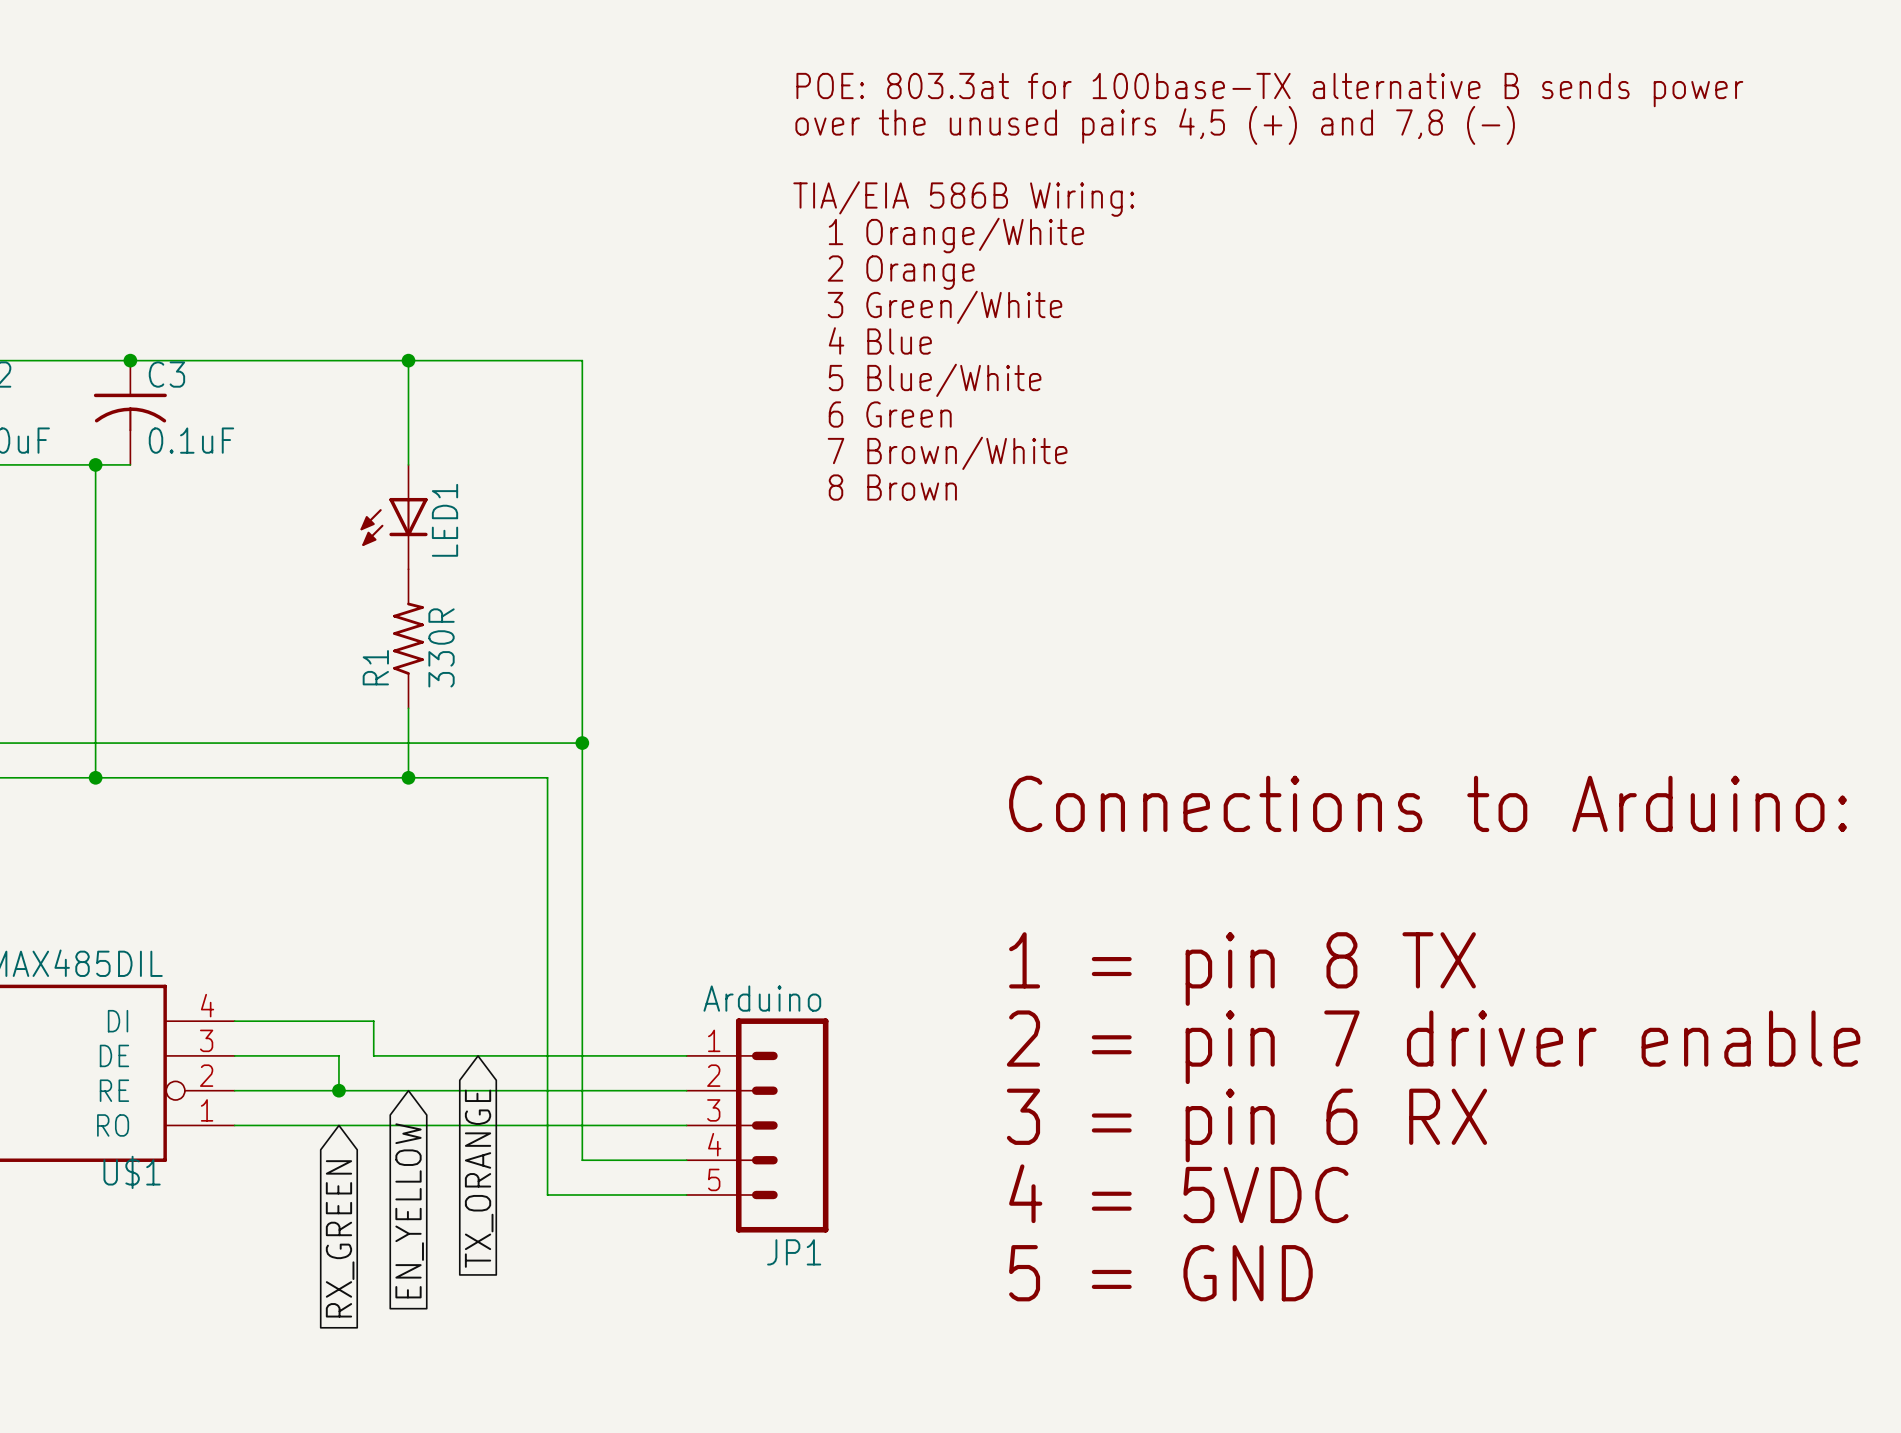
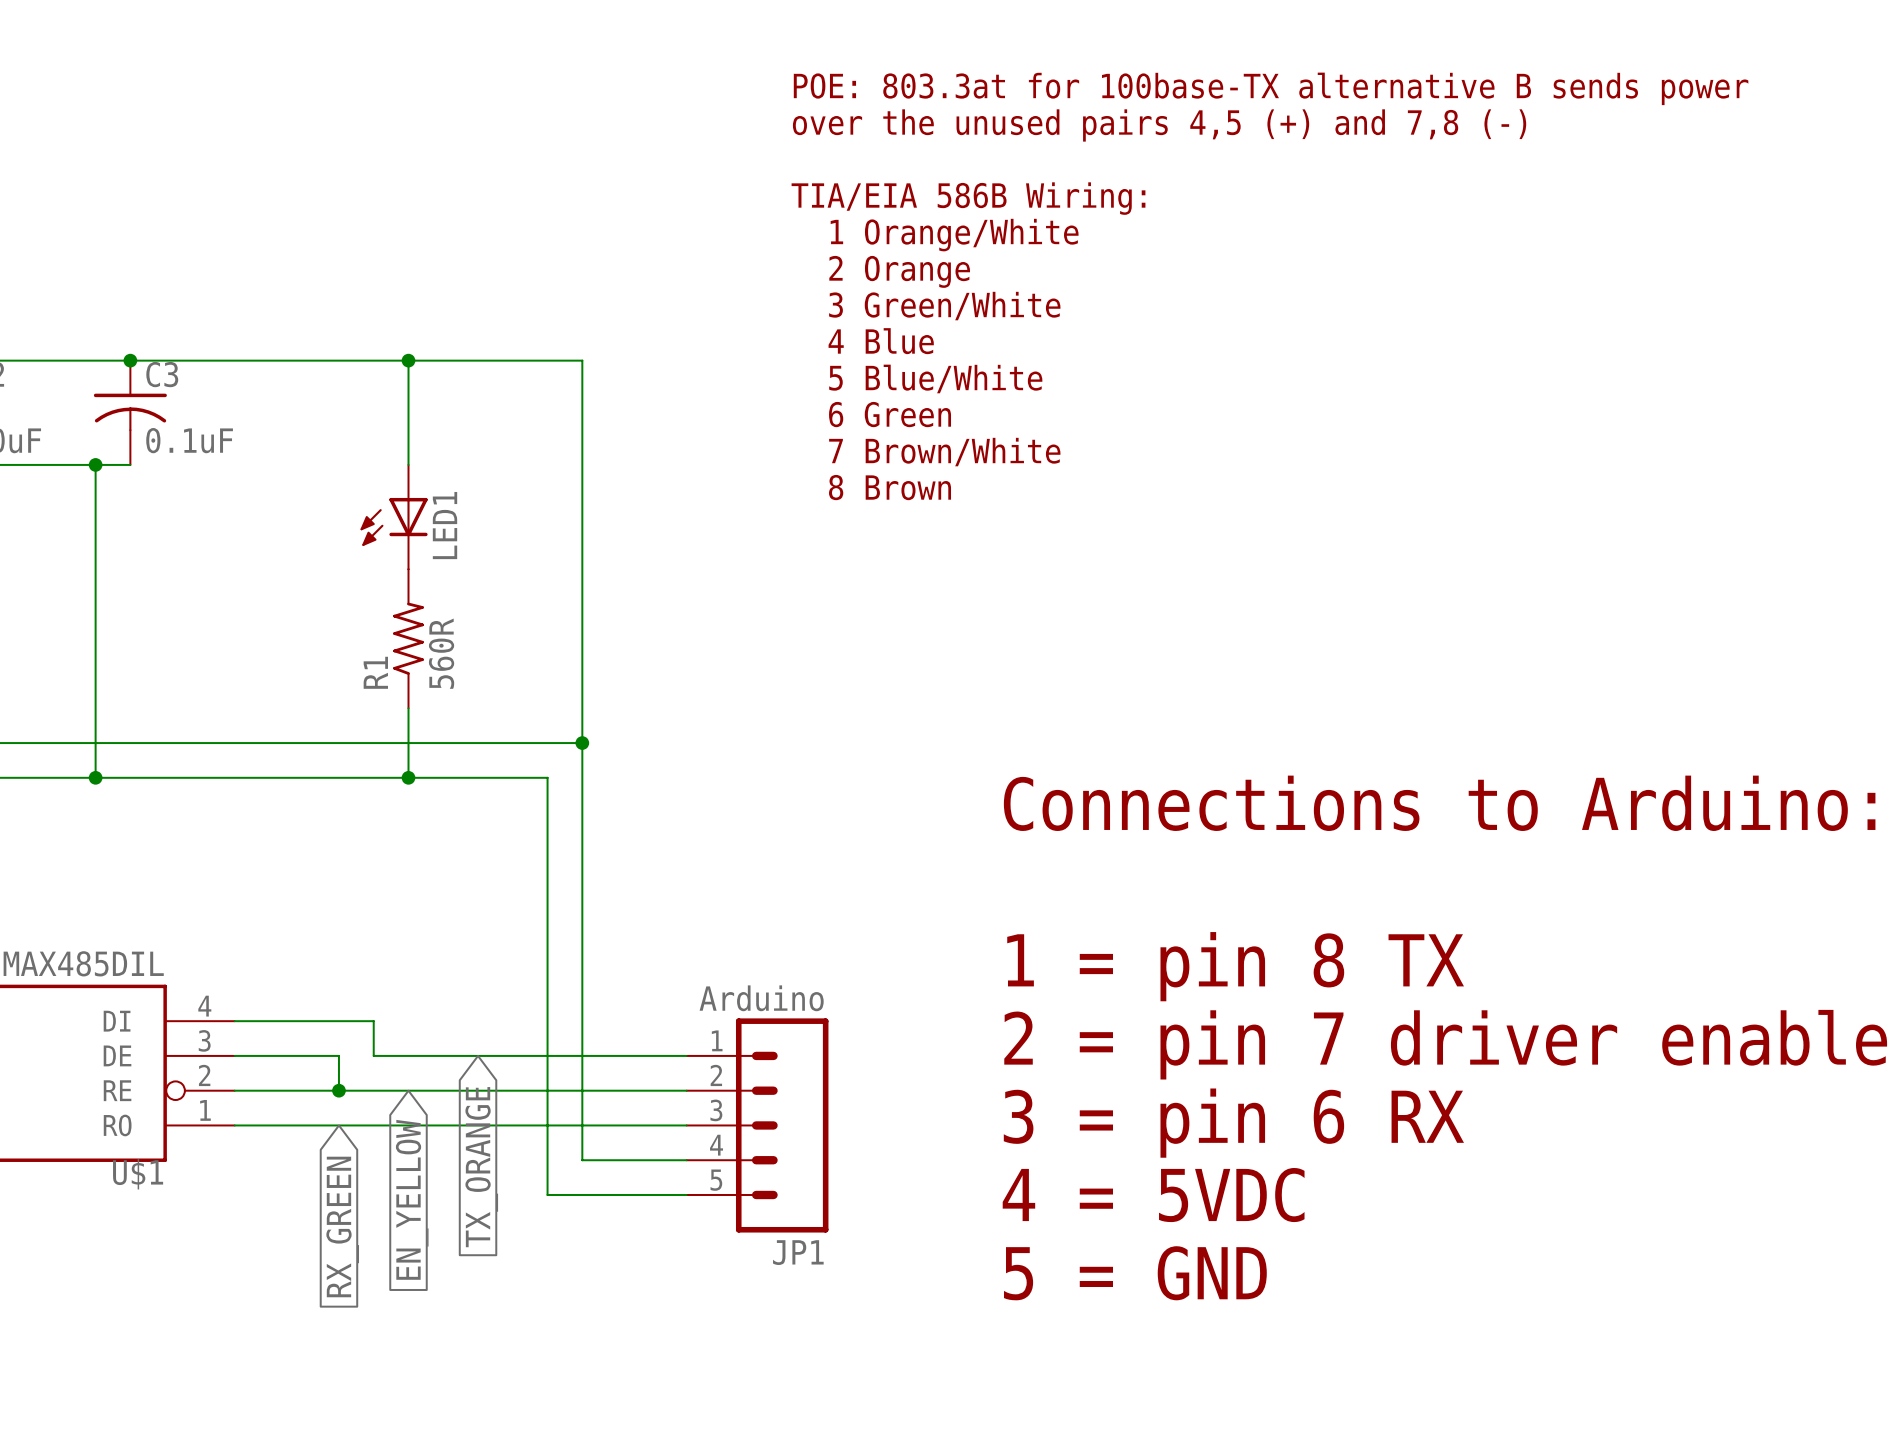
R1 value: 330R (441, 647) -> 560R (441, 653)

